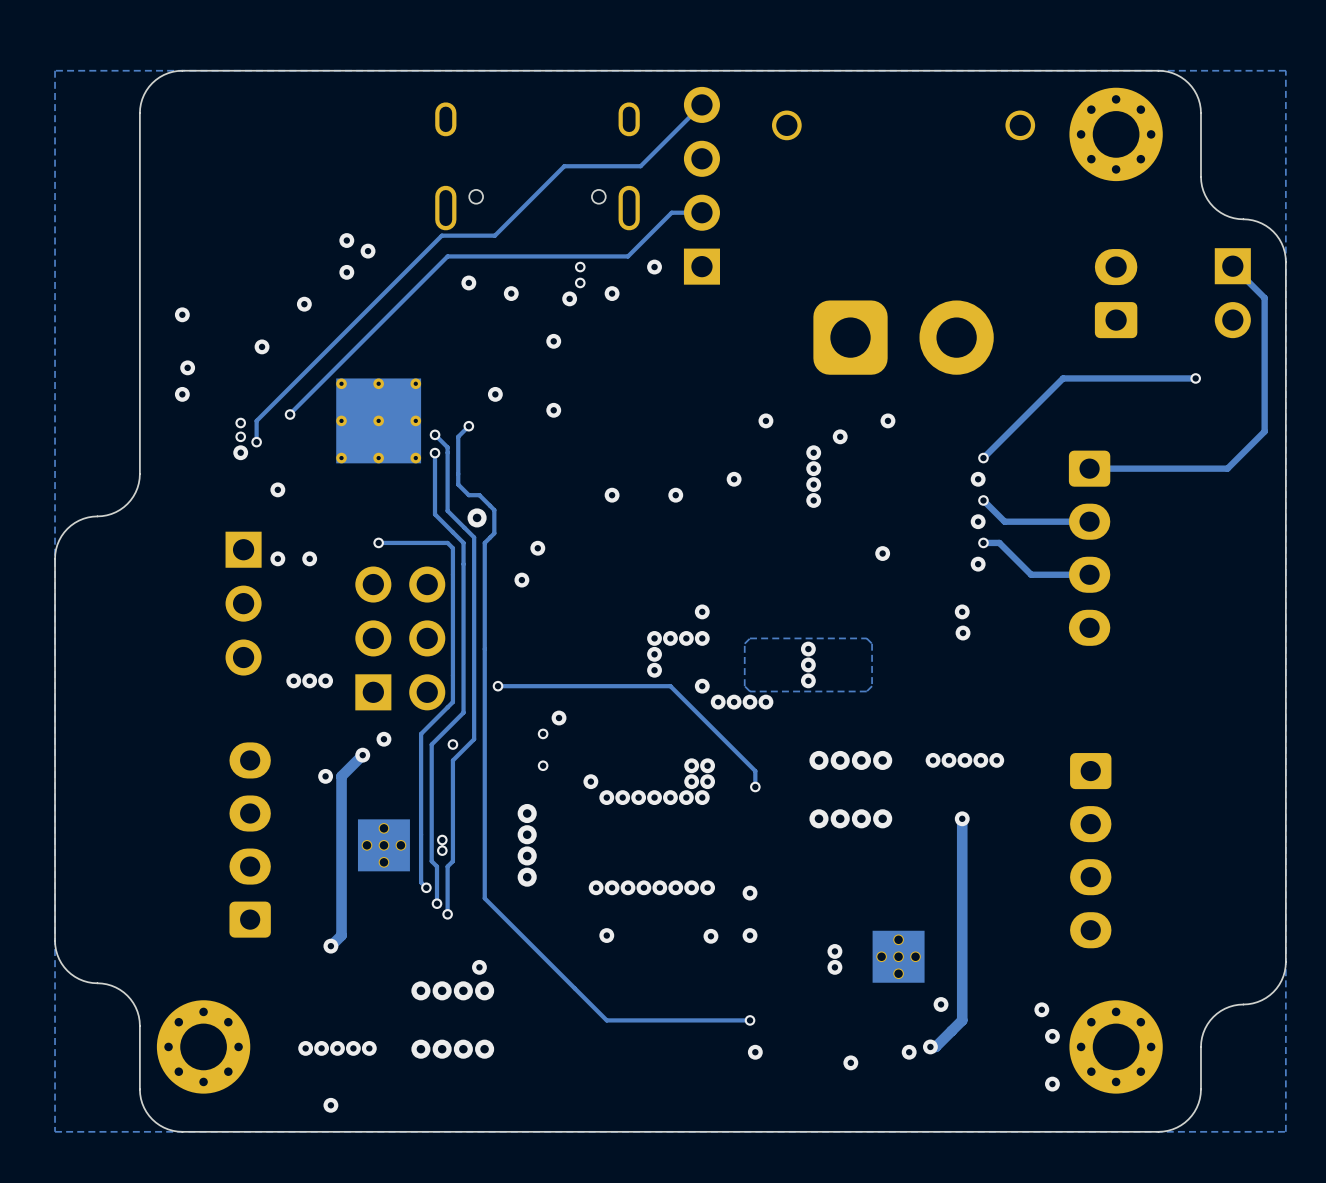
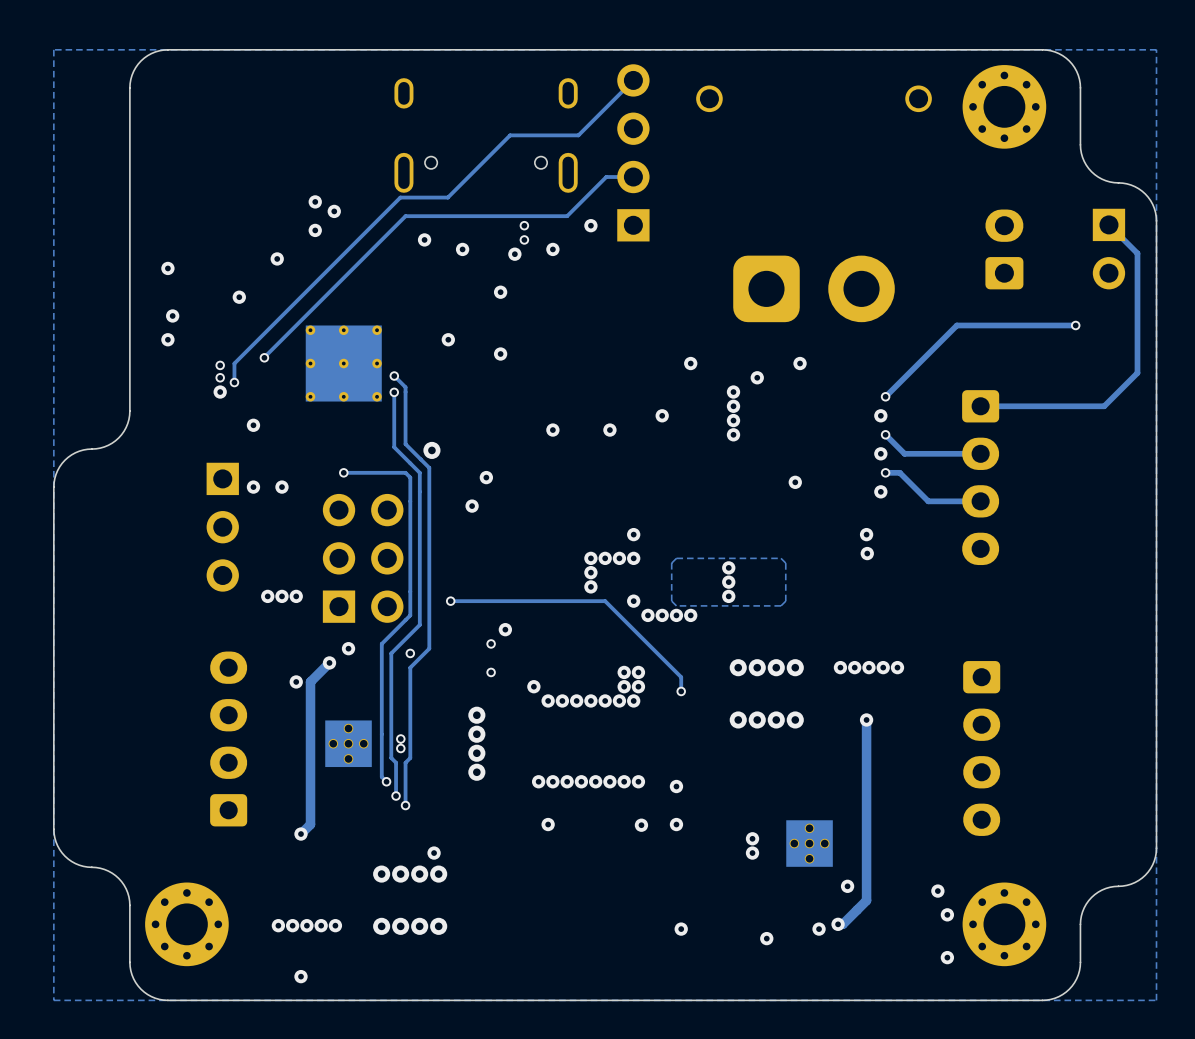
track: (468, 426) (458, 436) (458, 484) (468, 495) (479, 495) (494, 510) (494, 533) (484, 542) (484, 898) (606, 1020) (750, 1020) -> none
via: (468, 426) -> none
via: (750, 1020) -> none

